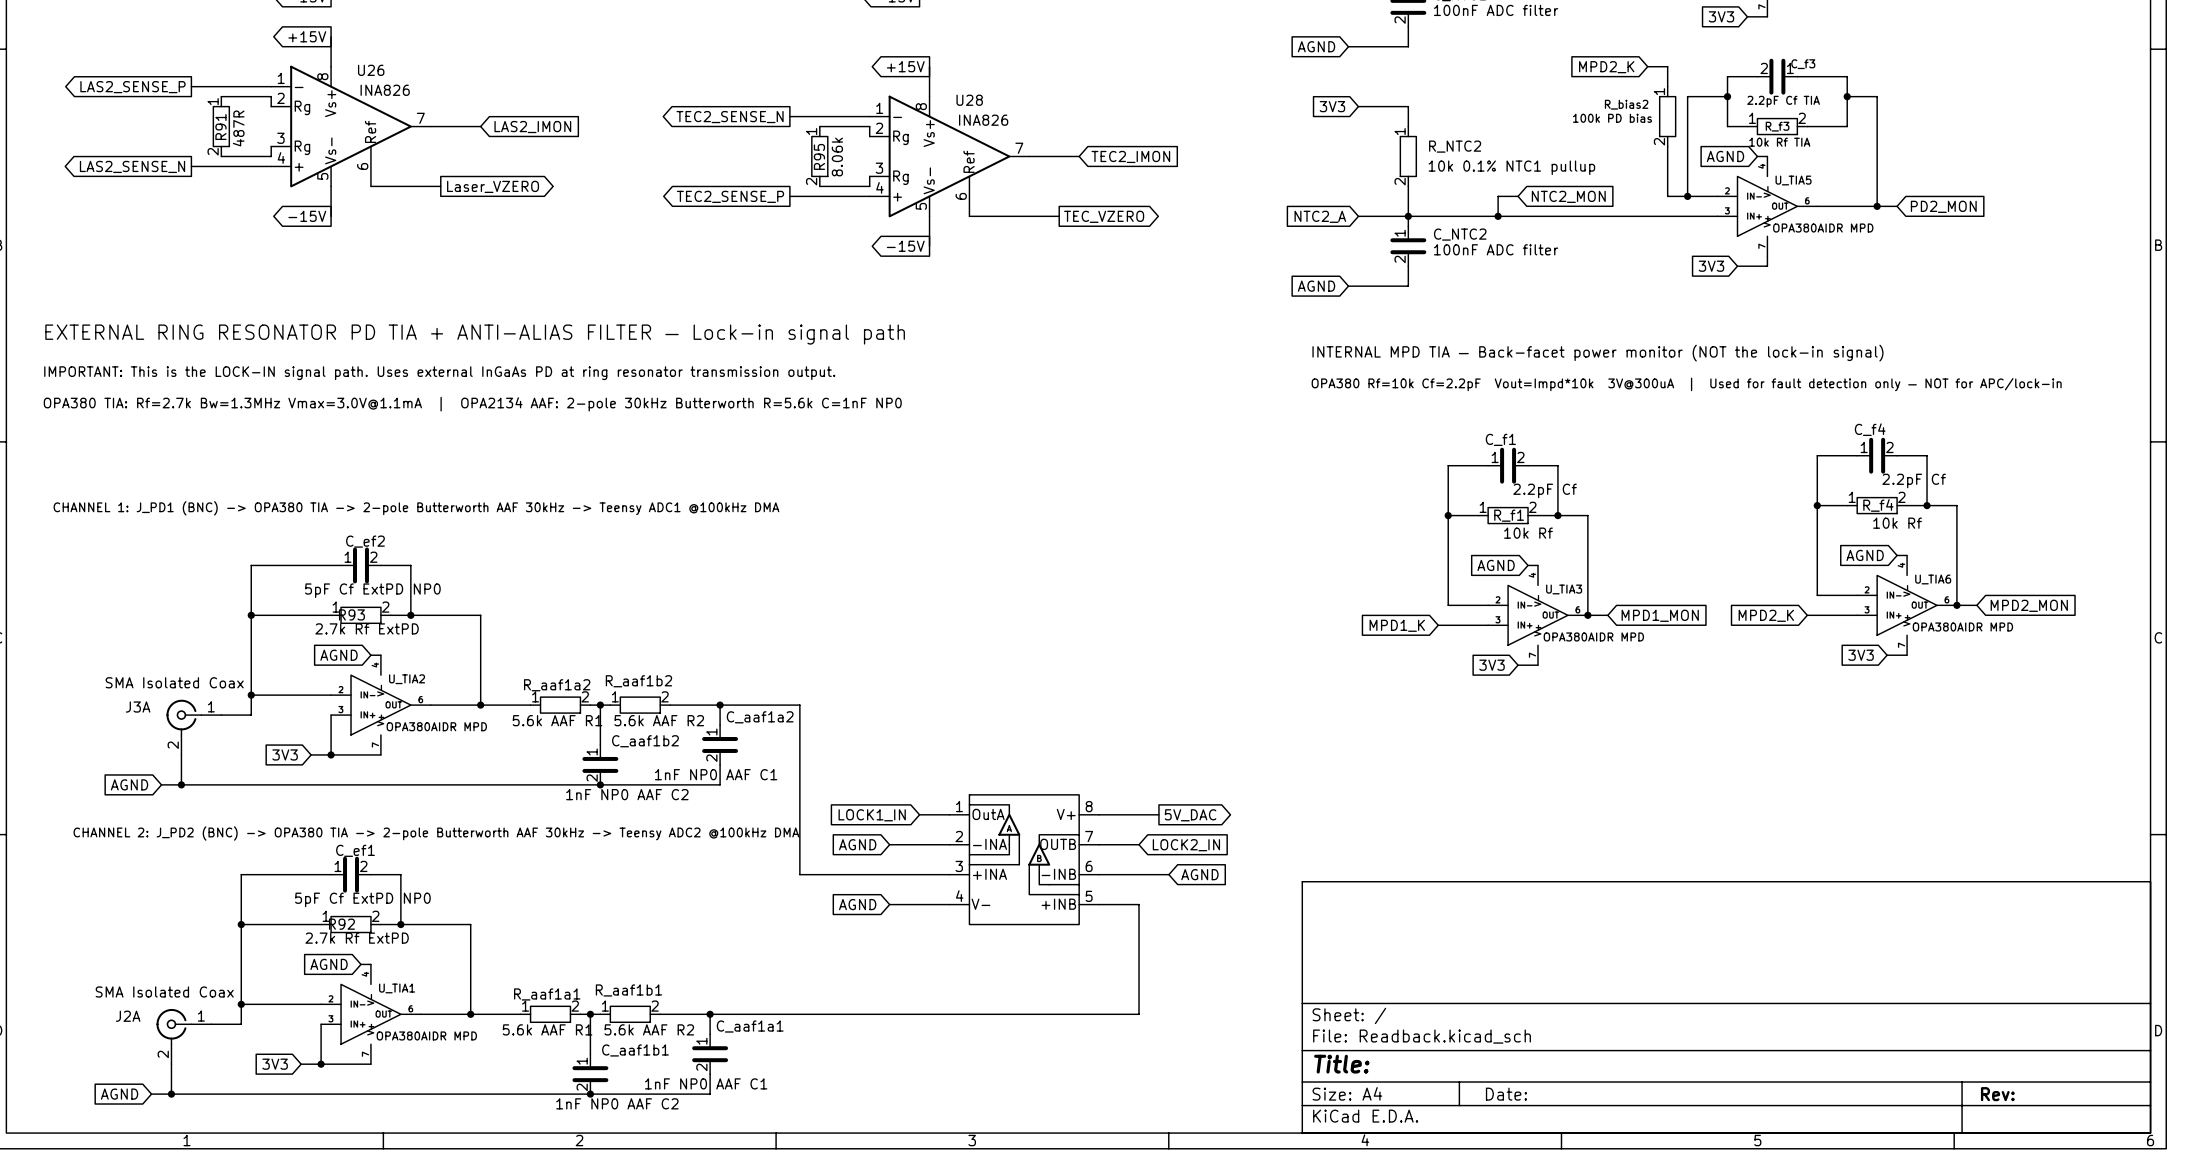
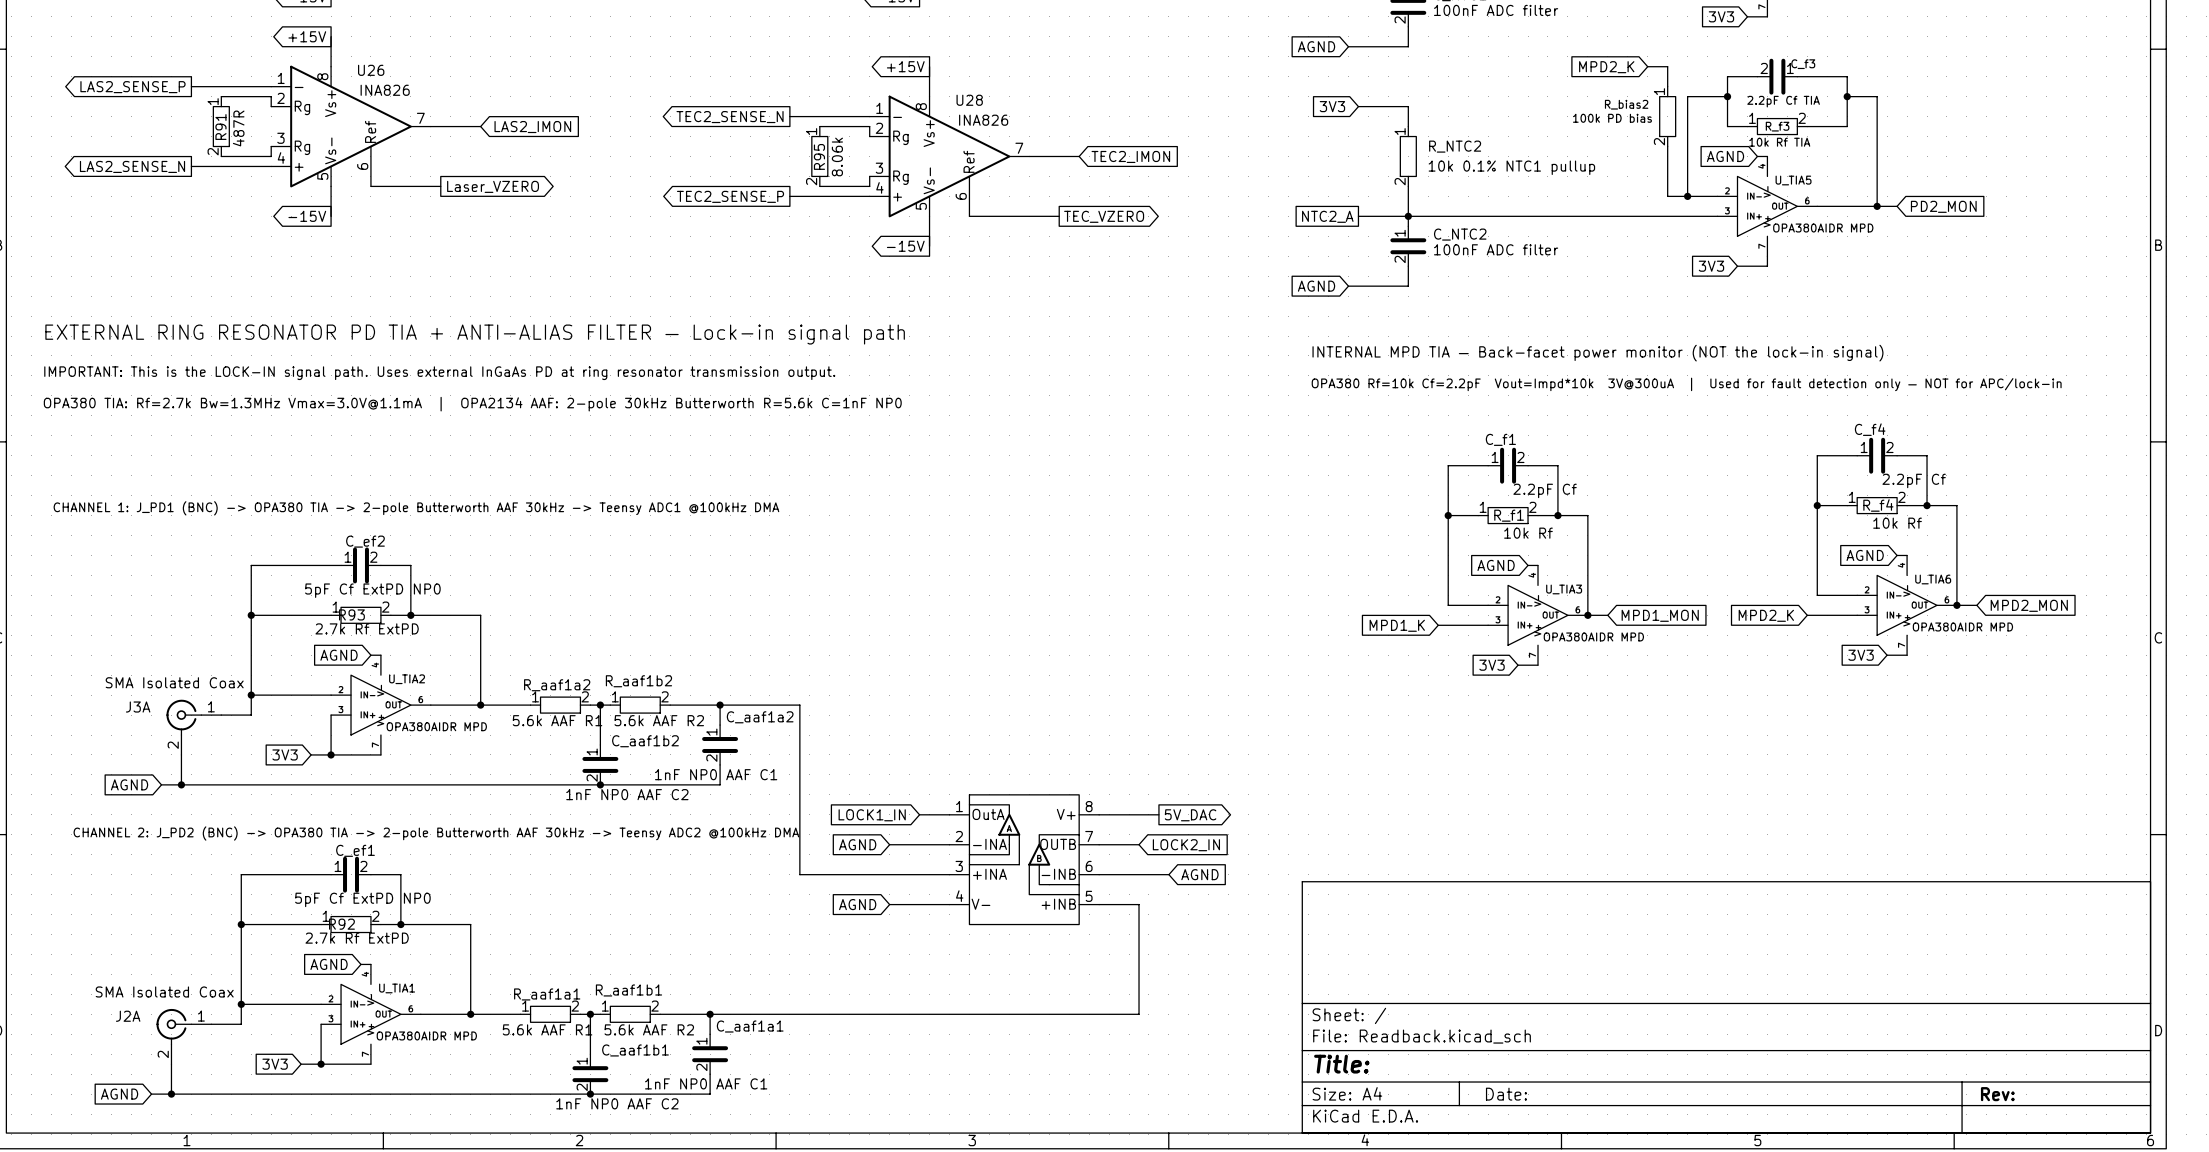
wire: (1518, 196) (1498, 196) (1498, 216) -> none
global label: NTC2_MON (1568, 196) -> none
global label shape: input (1320, 216) -> passive (1327, 216)
junction: (1498, 216) -> none

